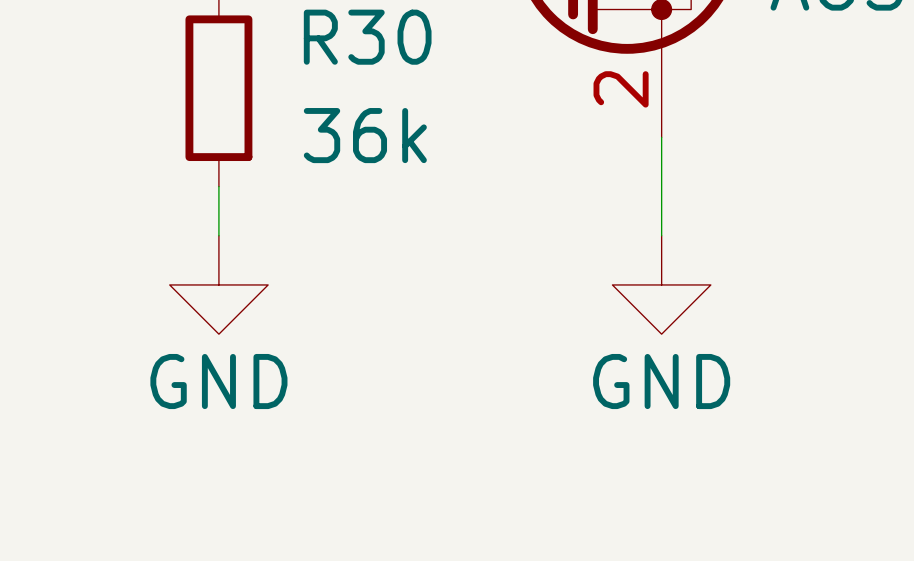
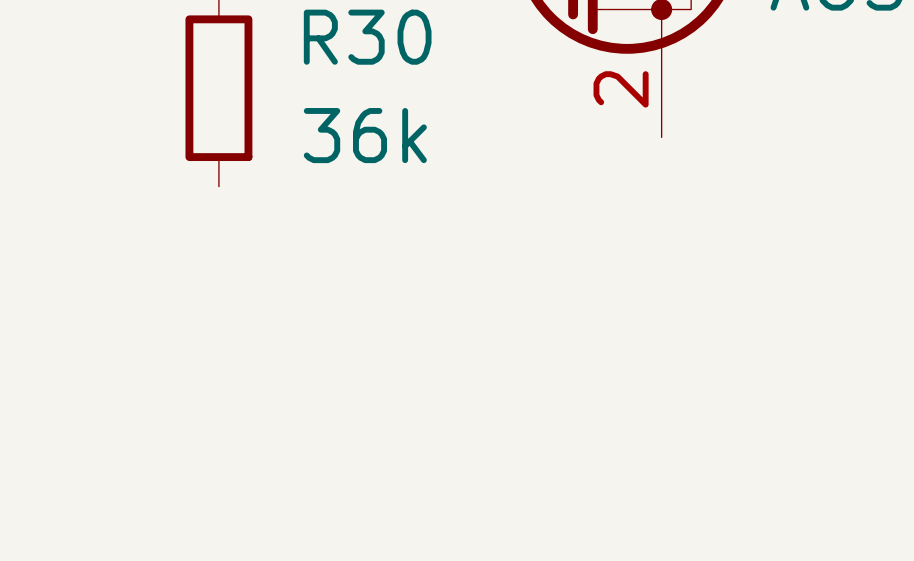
wire: (661, 137) (661, 235) -> none
wire: (218, 186) (218, 235) -> none
power symbol: GND (218, 284) -> none
power symbol: GND (661, 284) -> none

